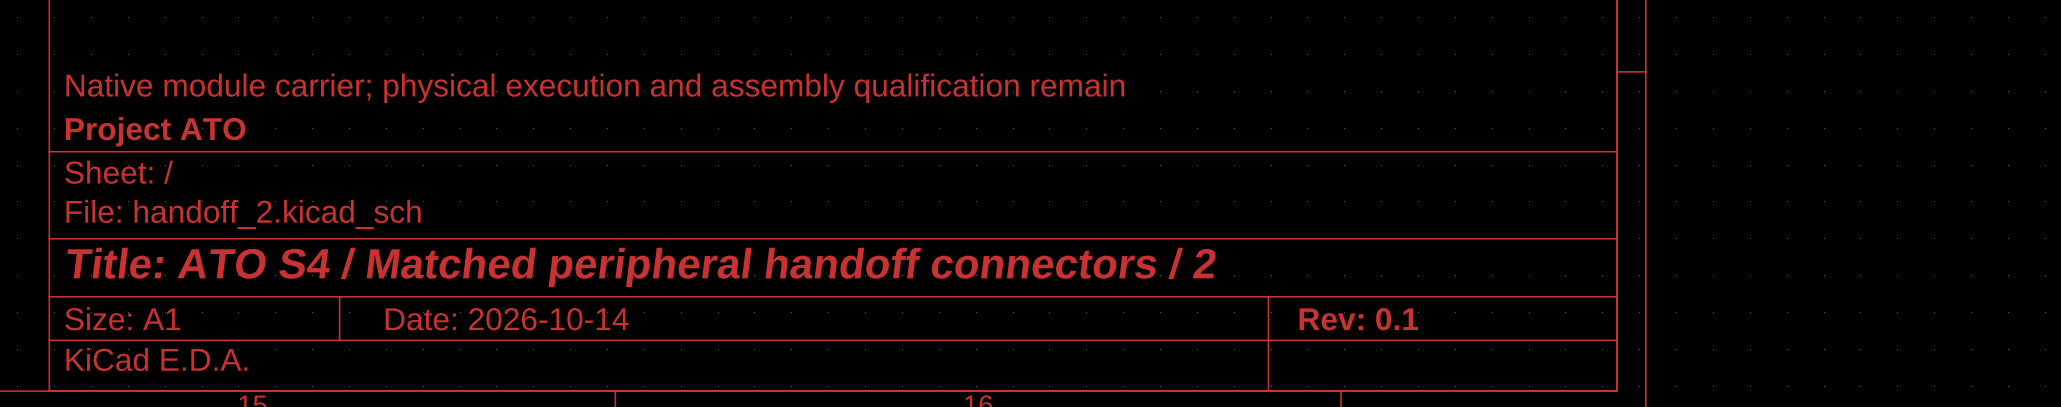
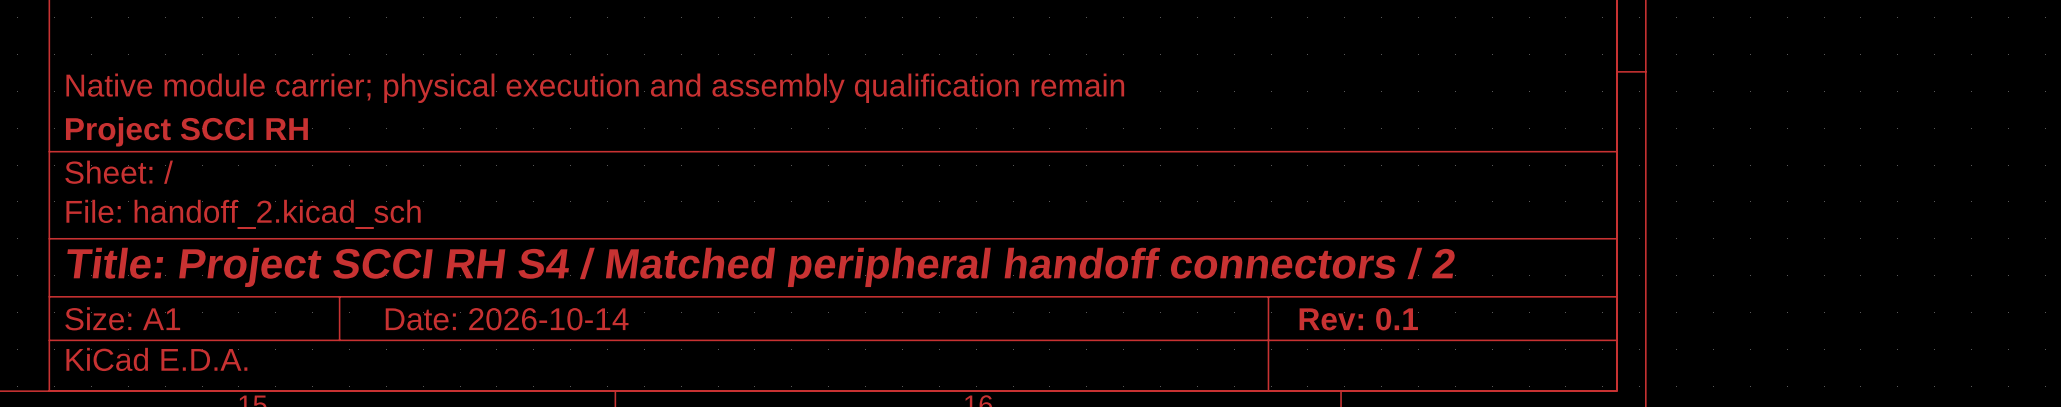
title block: Project ATO (155, 131) -> Project SCCI RH (186, 131)
title block: Title: ATO S4 / Matched peripheral handoff connectors / 2 (641, 267) -> Title: Project SCCI RH S4 / Matched peripheral handoff connectors / 2 (761, 267)

